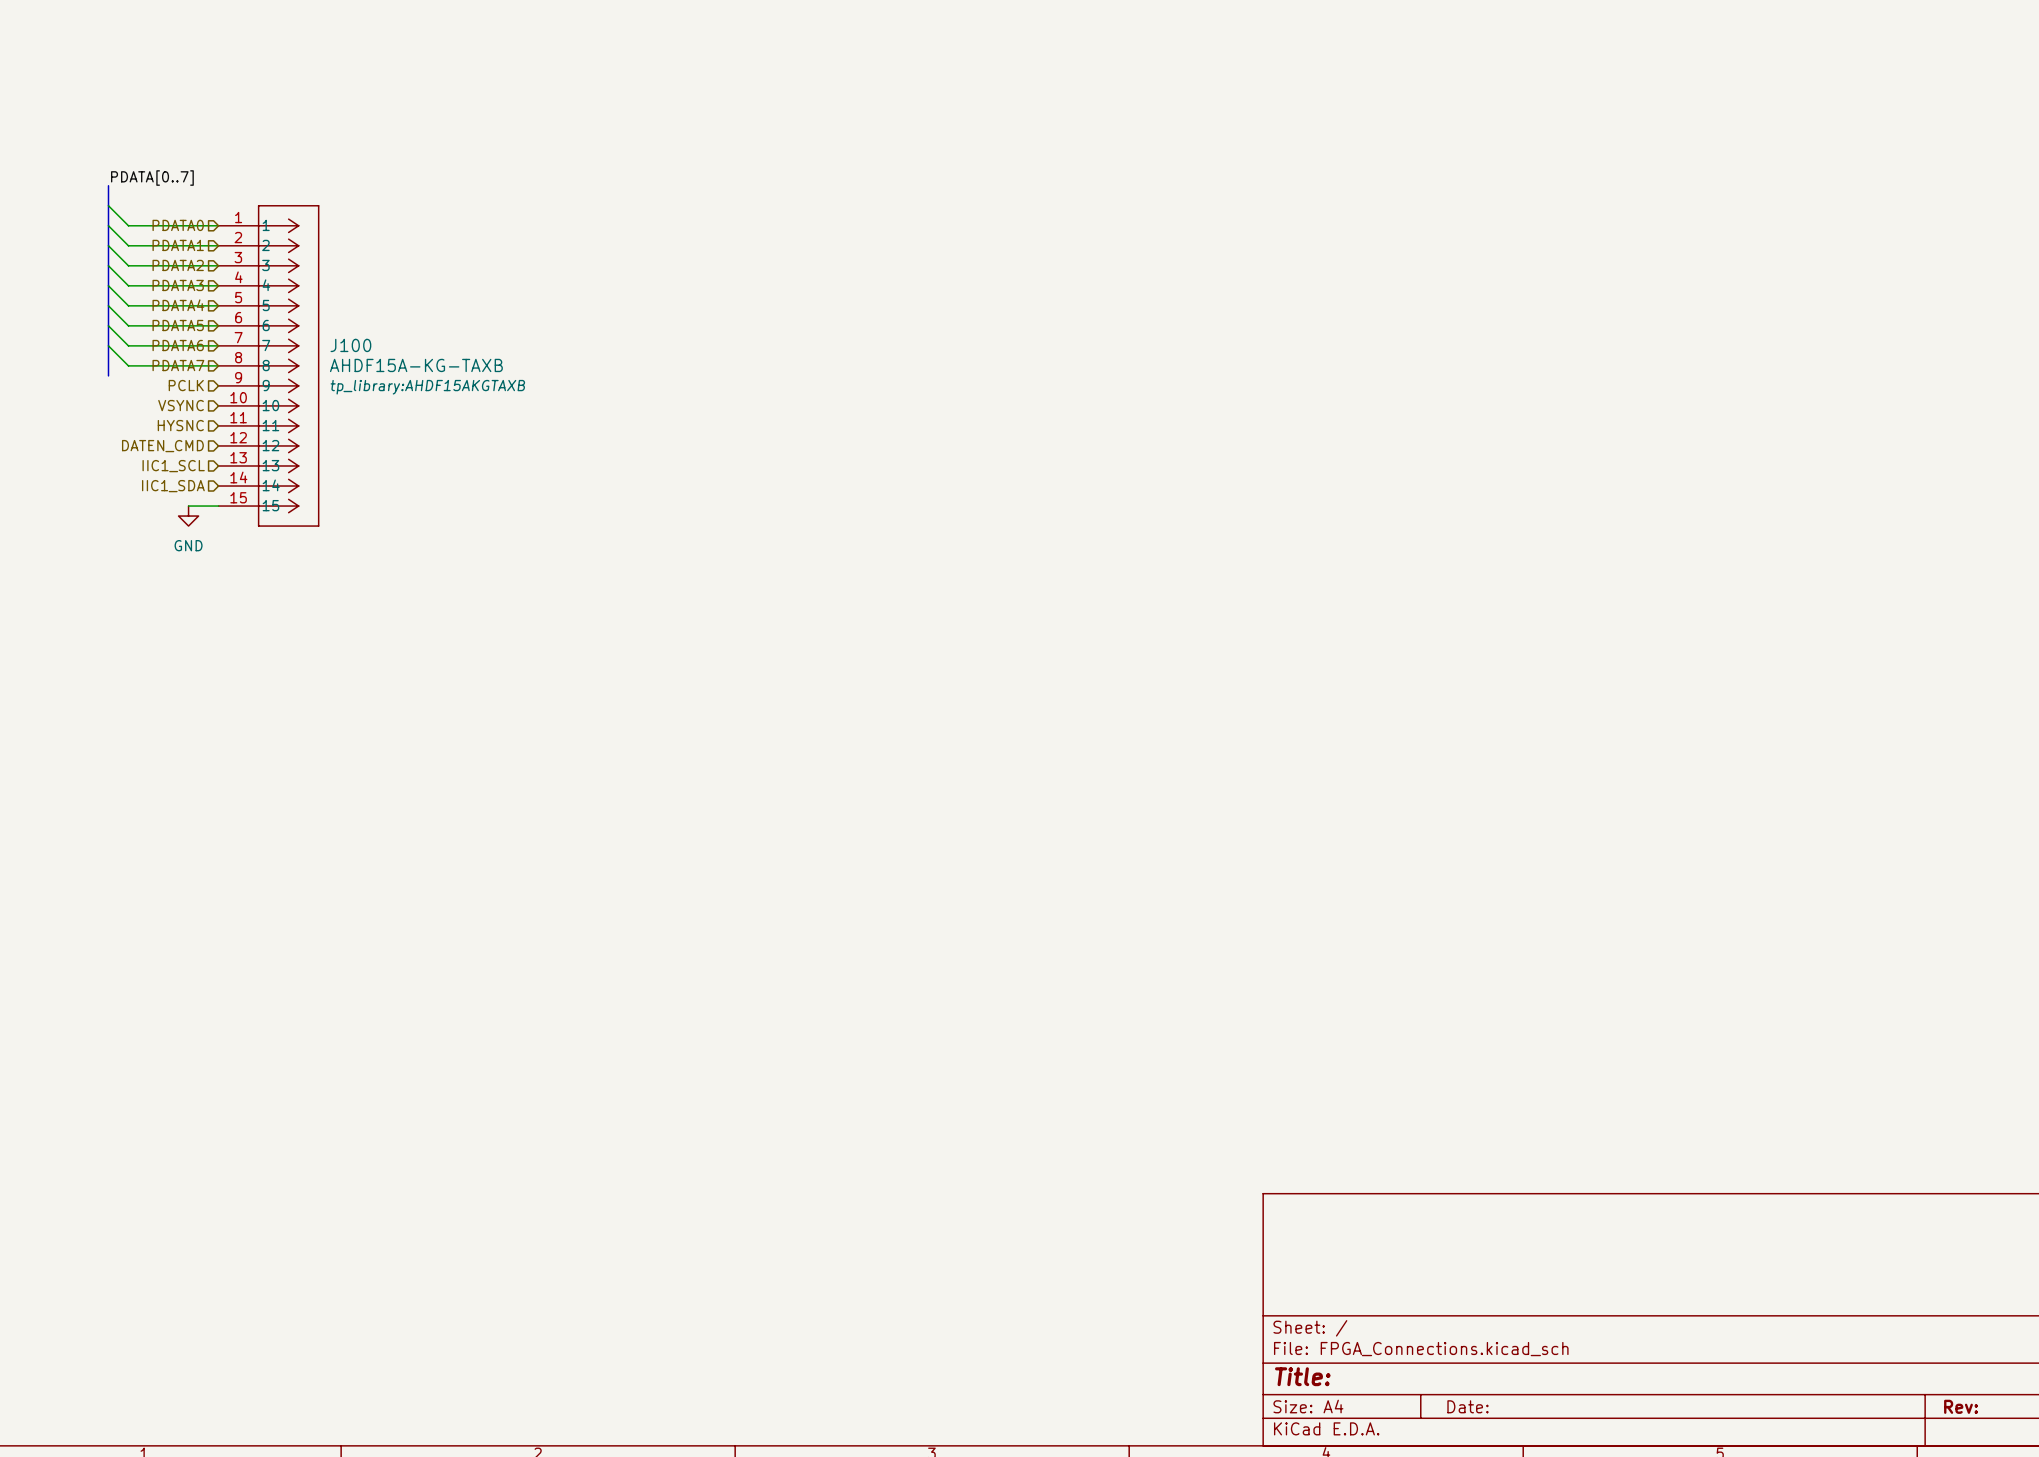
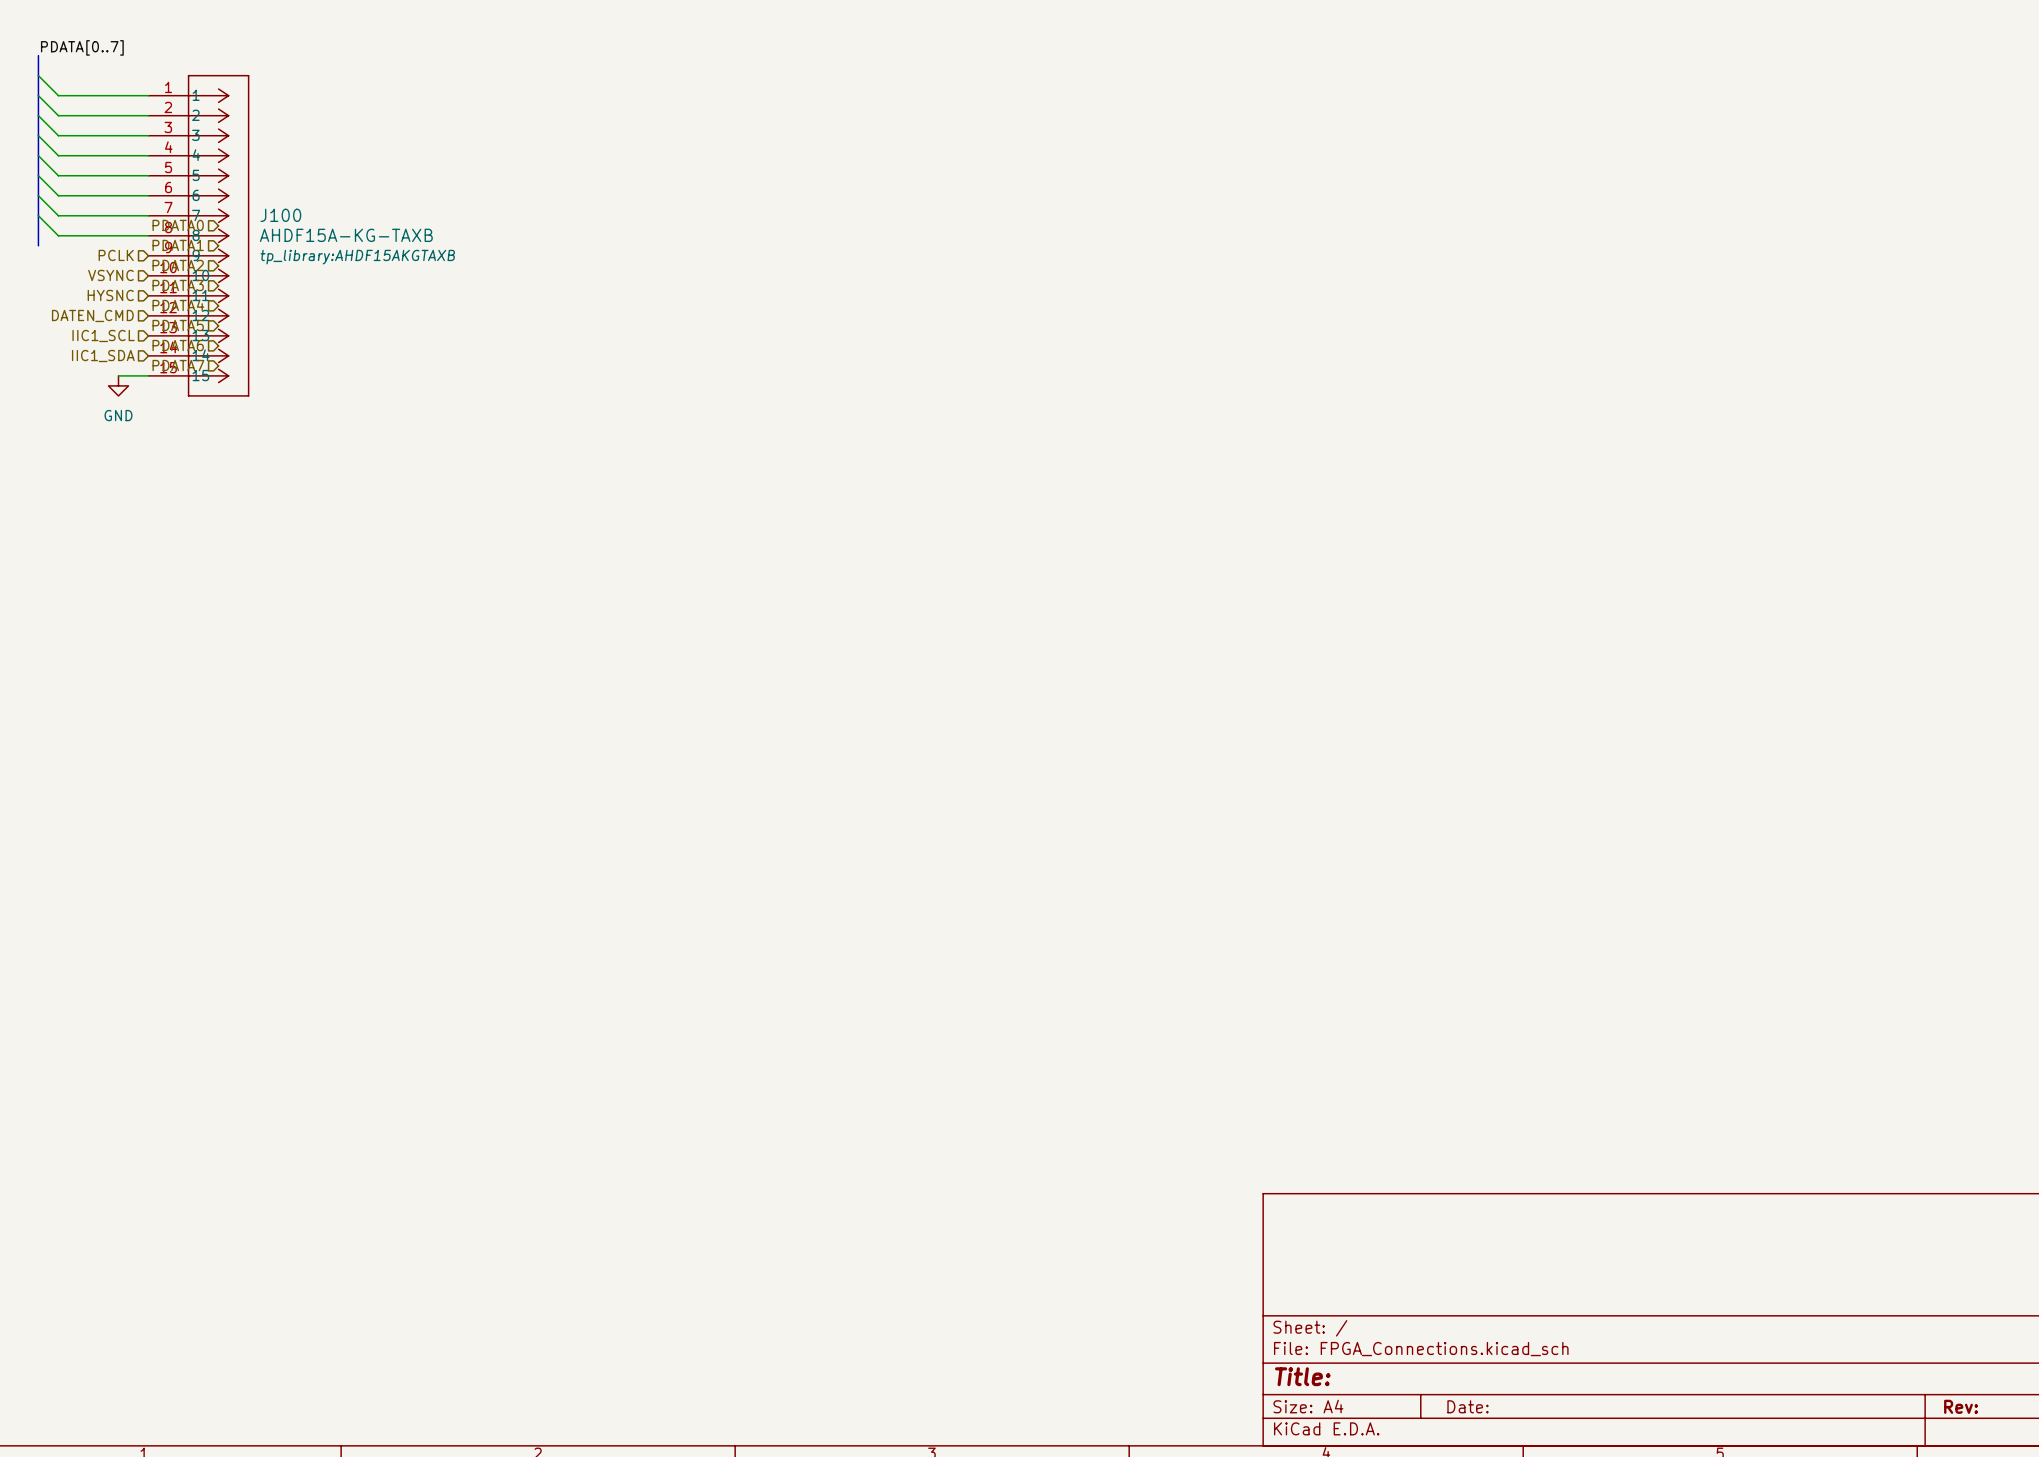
label position: PDATA[0..7] (152, 178) -> PDATA[0..7] (82, 47)
bus: (108, 185) (108, 375) -> (38, 55) (38, 245)
wire: (108, 205) (128, 225) (218, 225) -> (38, 75) (58, 95) (148, 95)
wire: (108, 225) (128, 245) (218, 245) -> (38, 95) (58, 115) (148, 115)
wire: (108, 245) (128, 265) (218, 265) -> (38, 115) (58, 135) (148, 135)
wire: (108, 265) (128, 285) (218, 285) -> (38, 135) (58, 155) (148, 155)
wire: (108, 285) (128, 305) (218, 305) -> (38, 155) (58, 175) (148, 175)
wire: (108, 305) (128, 325) (218, 325) -> (38, 175) (58, 195) (148, 195)
wire: (108, 325) (128, 345) (218, 345) -> (38, 195) (58, 215) (148, 215)
wire: (108, 345) (128, 365) (218, 365) -> (38, 215) (58, 235) (148, 235)
J100 position: (268, 365) -> (198, 235)
hierarchical label position: PCLK (186, 385) -> PCLK (116, 255)
hierarchical label position: VSYNC (181, 405) -> VSYNC (110, 275)
hierarchical label position: HYSNC (180, 425) -> HYSNC (110, 295)
hierarchical label position: DATEN_CMD (162, 446) -> DATEN_CMD (92, 315)
hierarchical label position: IIC1_SCL (173, 466) -> IIC1_SCL (103, 335)
hierarchical label position: IIC1_SDA (173, 486) -> IIC1_SDA (103, 356)
wire: (188, 506) (218, 506) -> (118, 375) (148, 375)
power symbol position: GND (188, 516) -> GND (118, 385)

